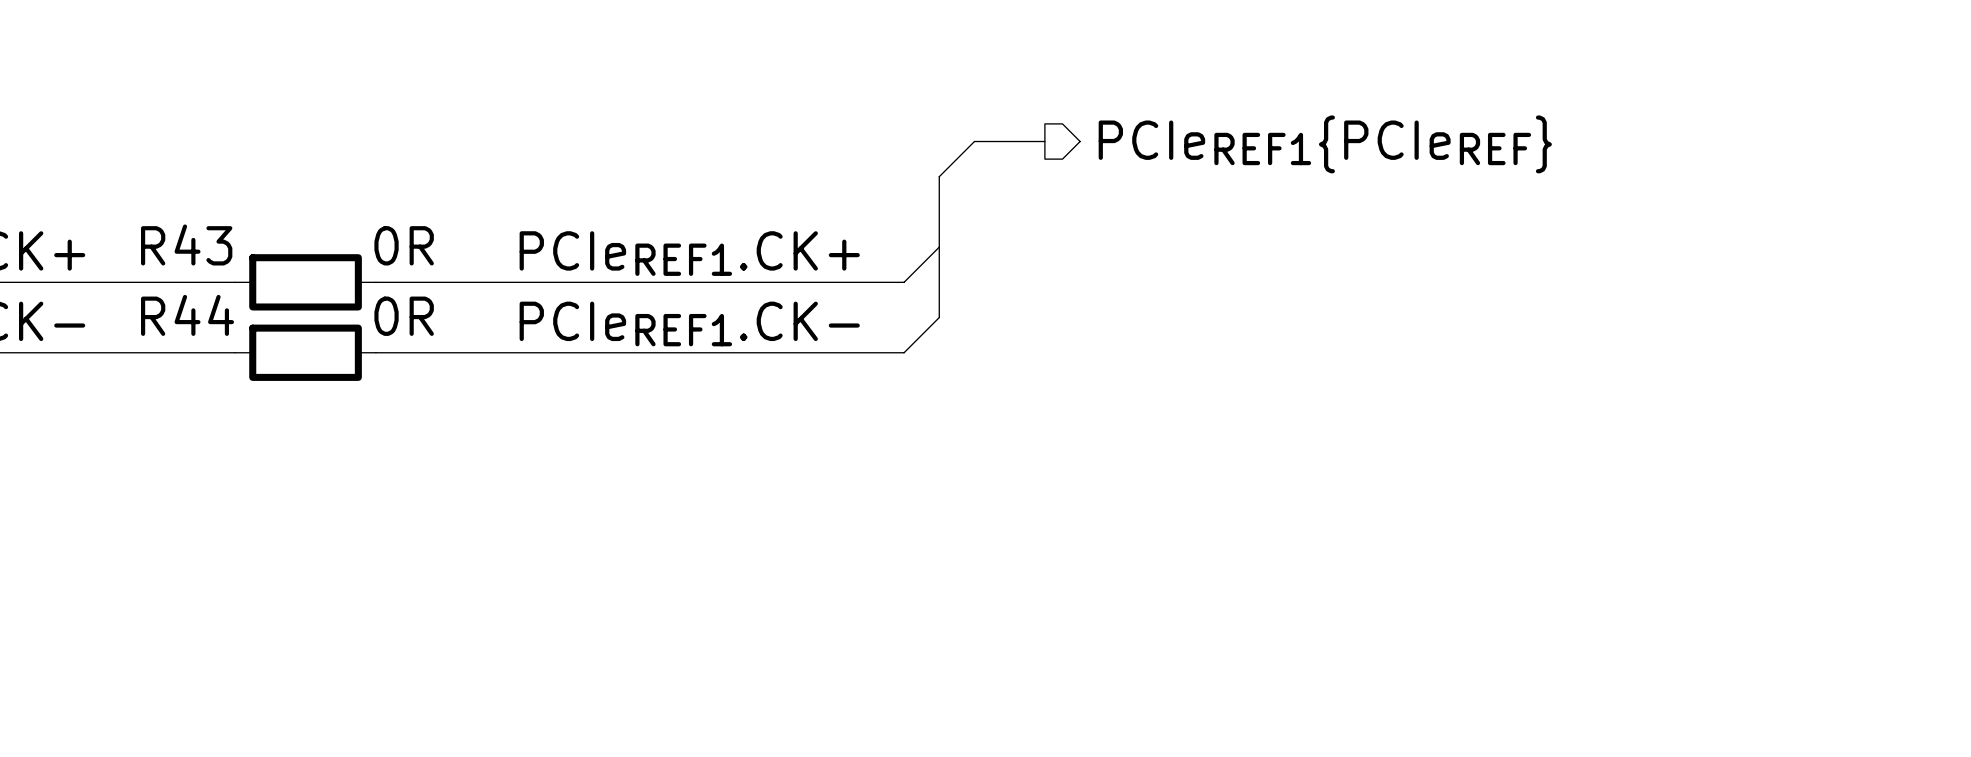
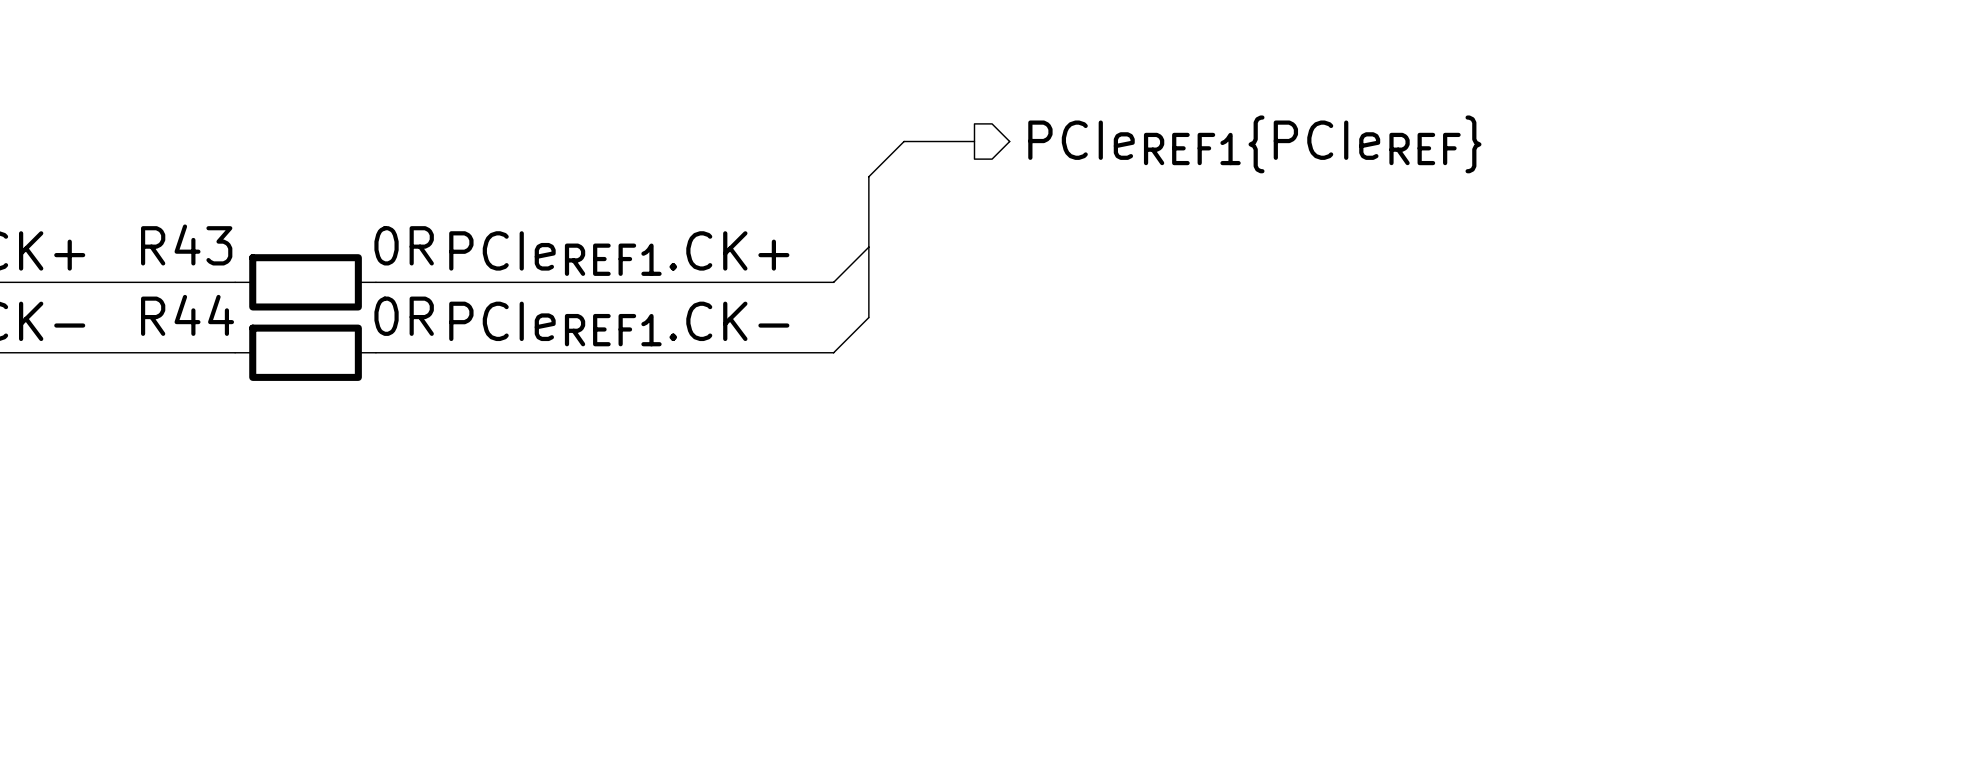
bus: (1044, 141) (974, 141) (939, 176) (939, 317) -> (974, 141) (904, 141) (868, 176) (868, 317)
hierarchical label position: PCIeREF1{PCIeREF} (1325, 144) -> PCIeREF1{PCIeREF} (1254, 144)
wire: (939, 247) (904, 282) (833, 282) -> (868, 247) (833, 282)
label position: PCIeREF1.CK+ (689, 253) -> PCIeREF1.CK+ (619, 253)
wire: (939, 317) (904, 352) (833, 352) -> (868, 317) (833, 352)
label position: PCIeREF1.CK- (689, 323) -> PCIeREF1.CK- (619, 323)

